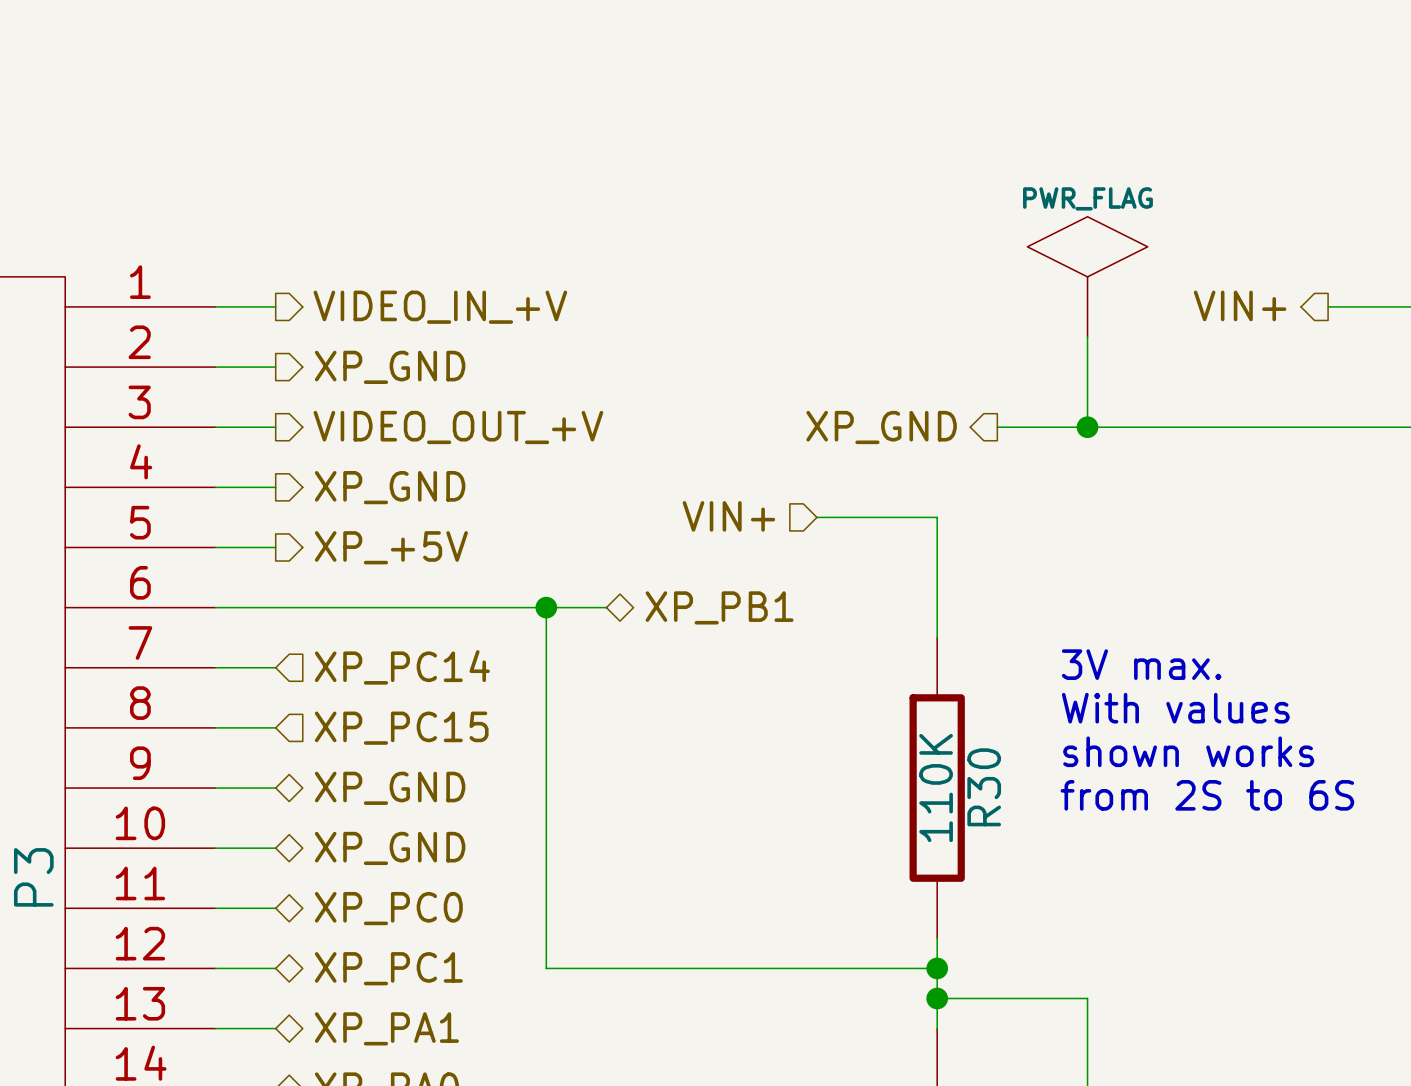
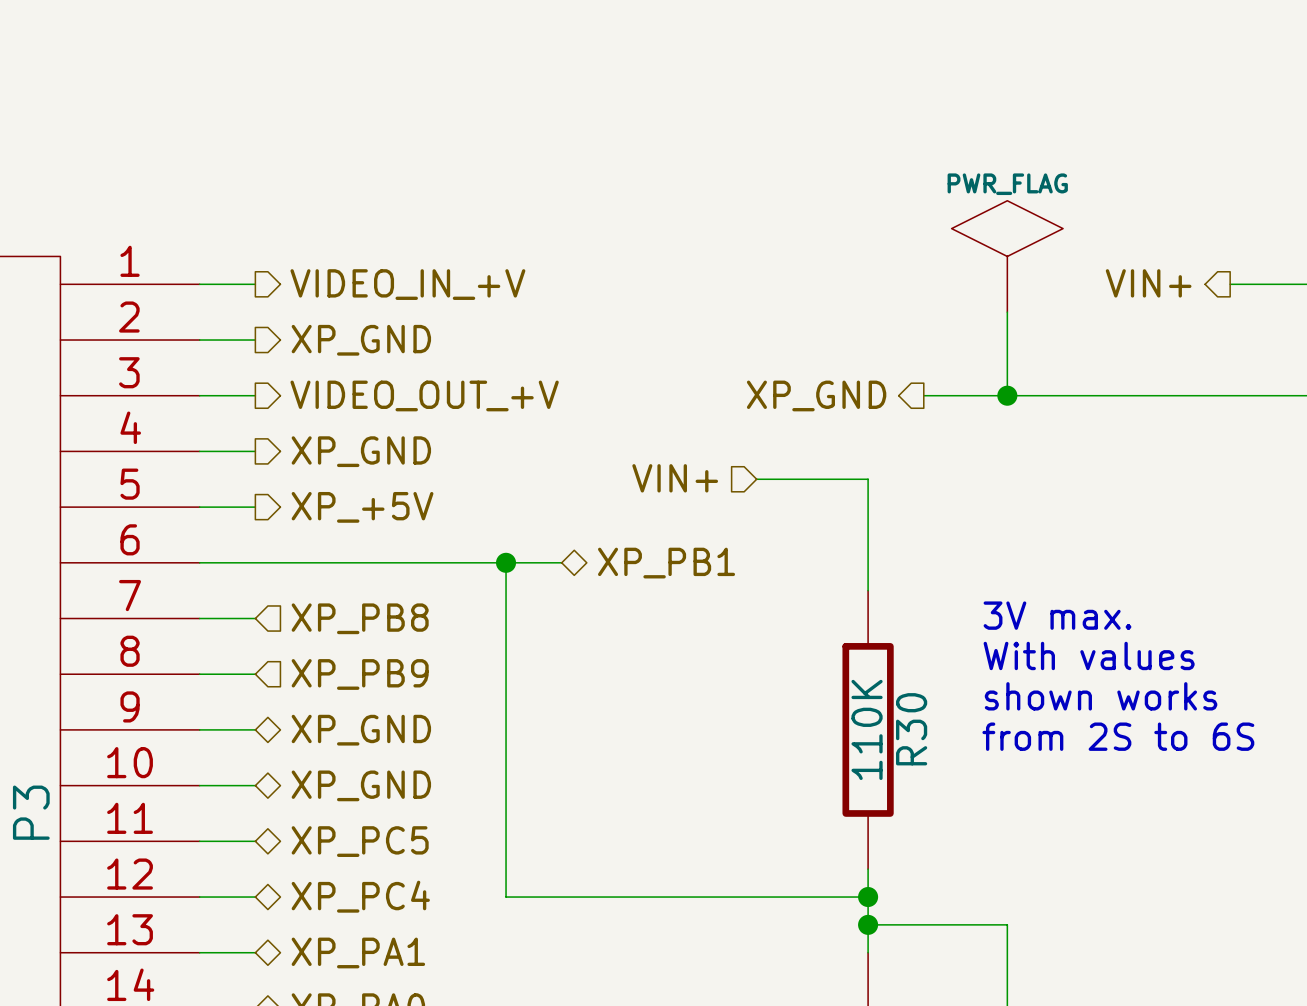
hierarchical label: XP_PC14 (402, 667) -> XP_PB8 (360, 618)
hierarchical label: XP_PC15 (401, 728) -> XP_PB9 (360, 674)
hierarchical label: XP_PC0 (388, 908) -> XP_PC5 (360, 841)
hierarchical label: XP_PC1 (388, 968) -> XP_PC4 (360, 896)

